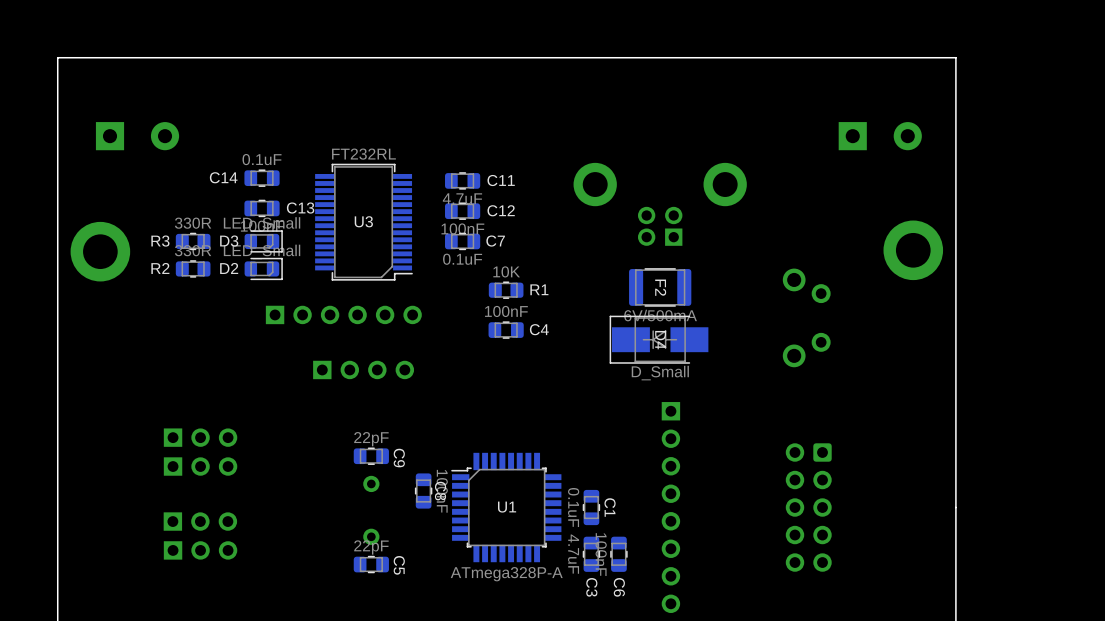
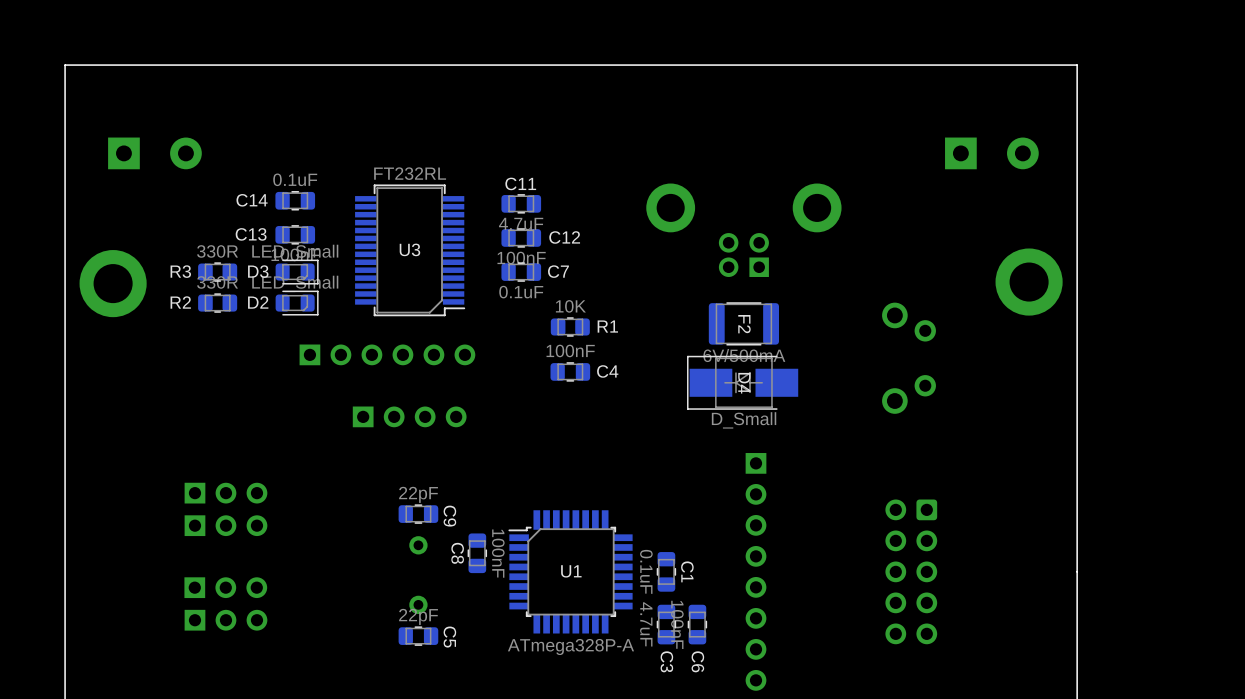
C11 name position: C11 (501, 180) -> C11 (520, 183)
C13 name position: C13 (300, 208) -> C13 (251, 234)
C8 name position: C8 (440, 491) -> C8 (457, 553)

